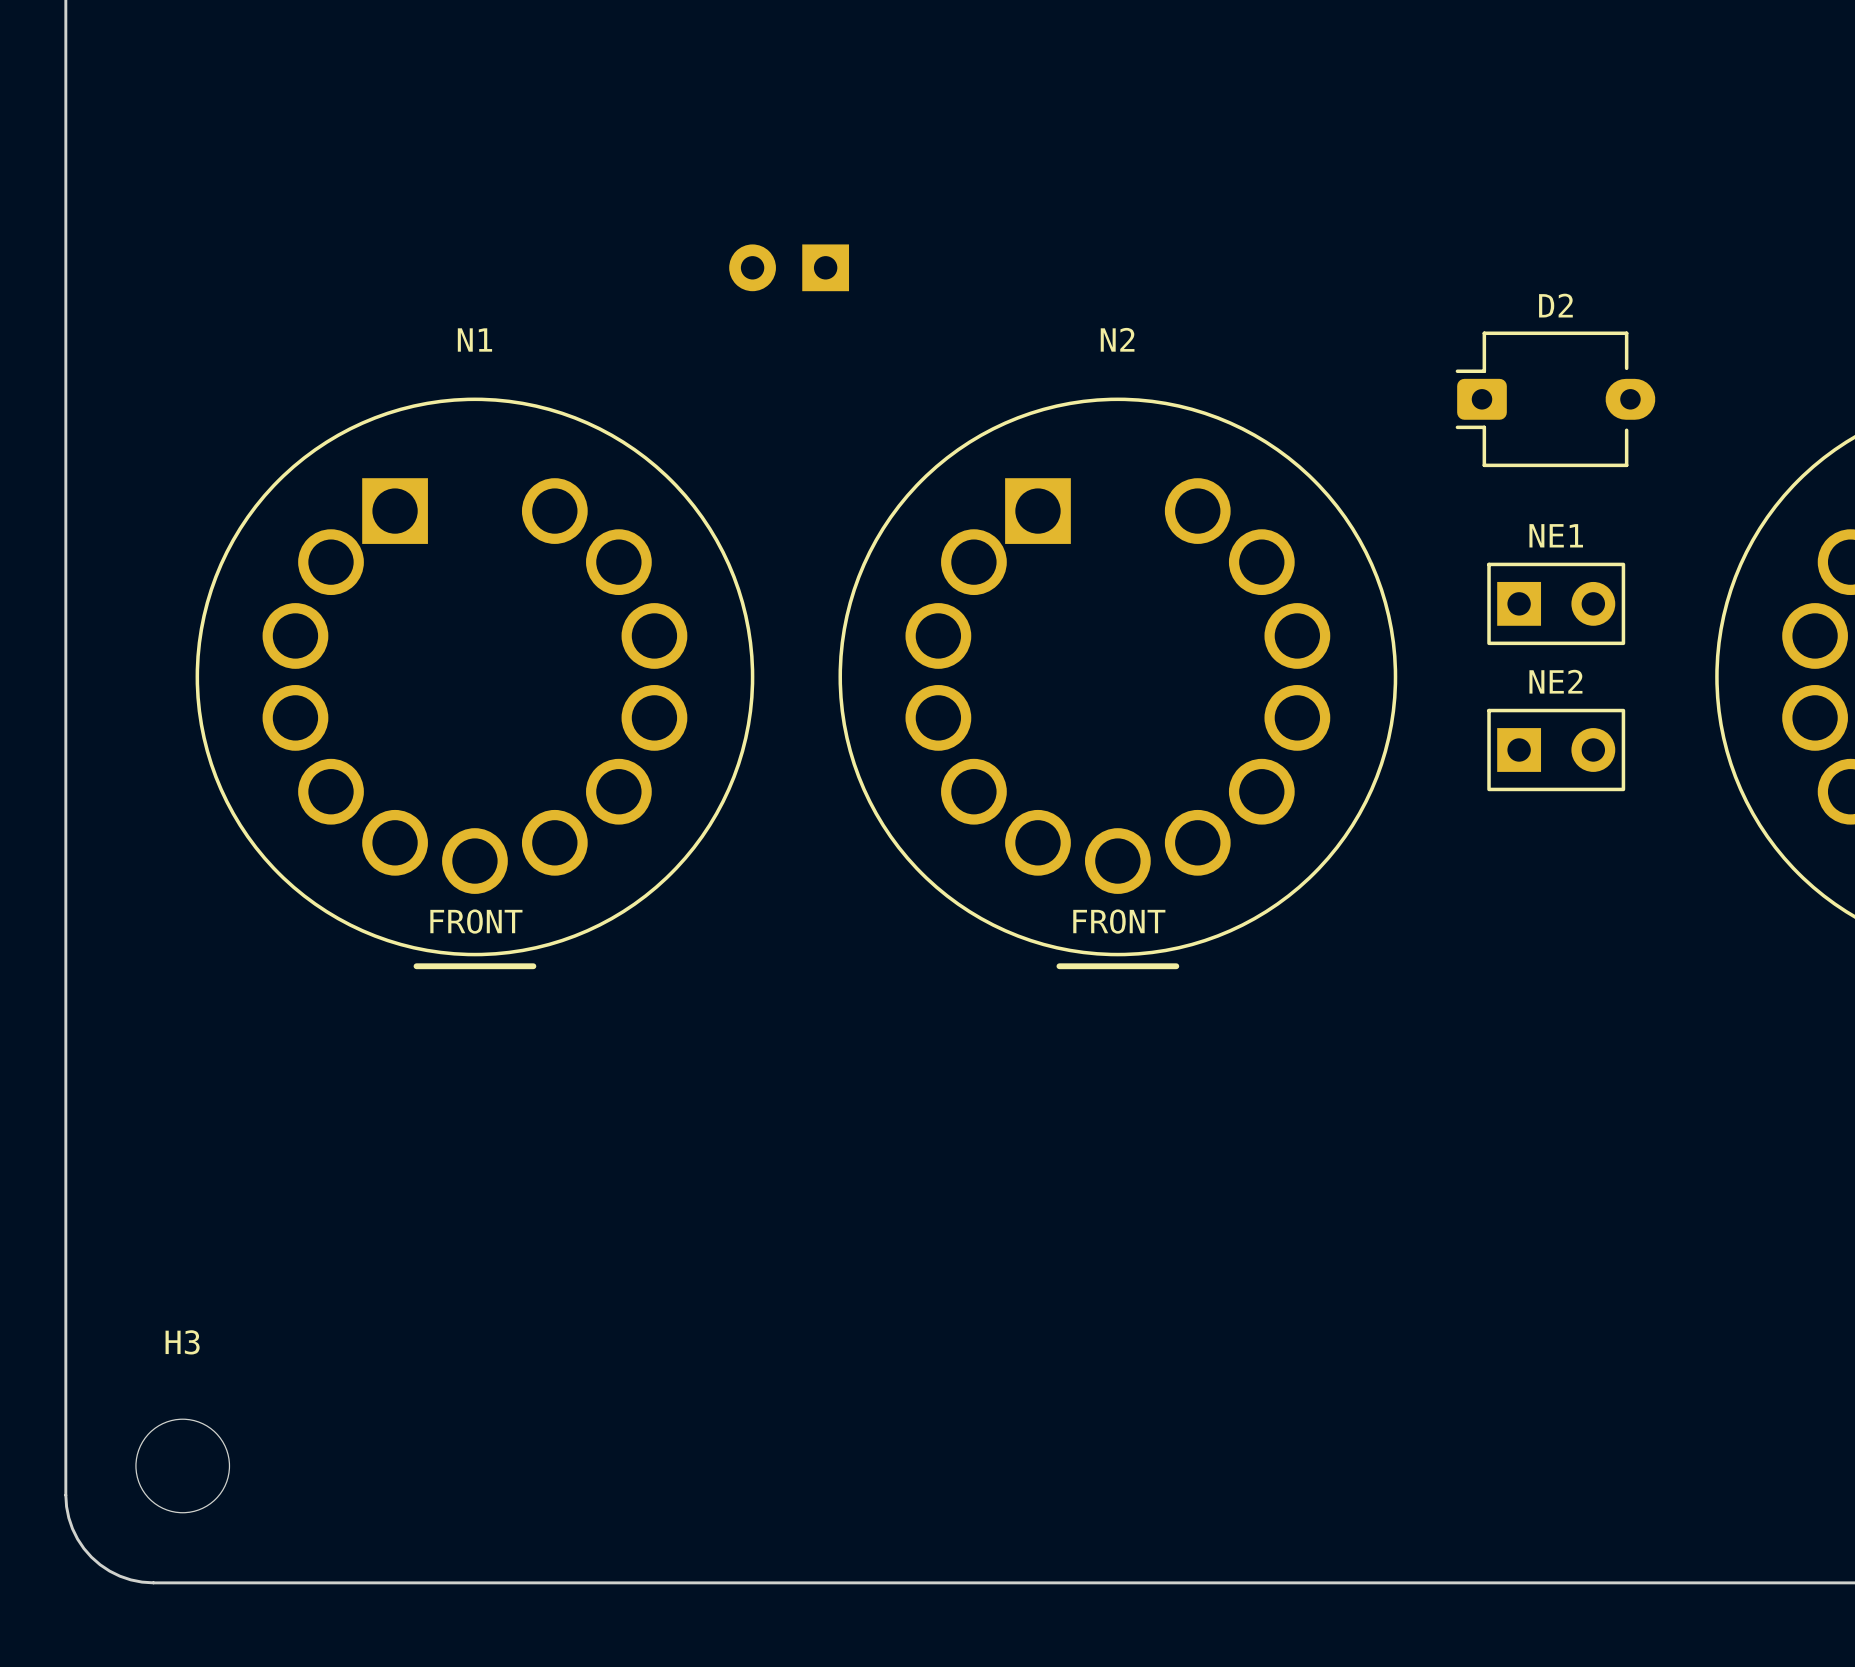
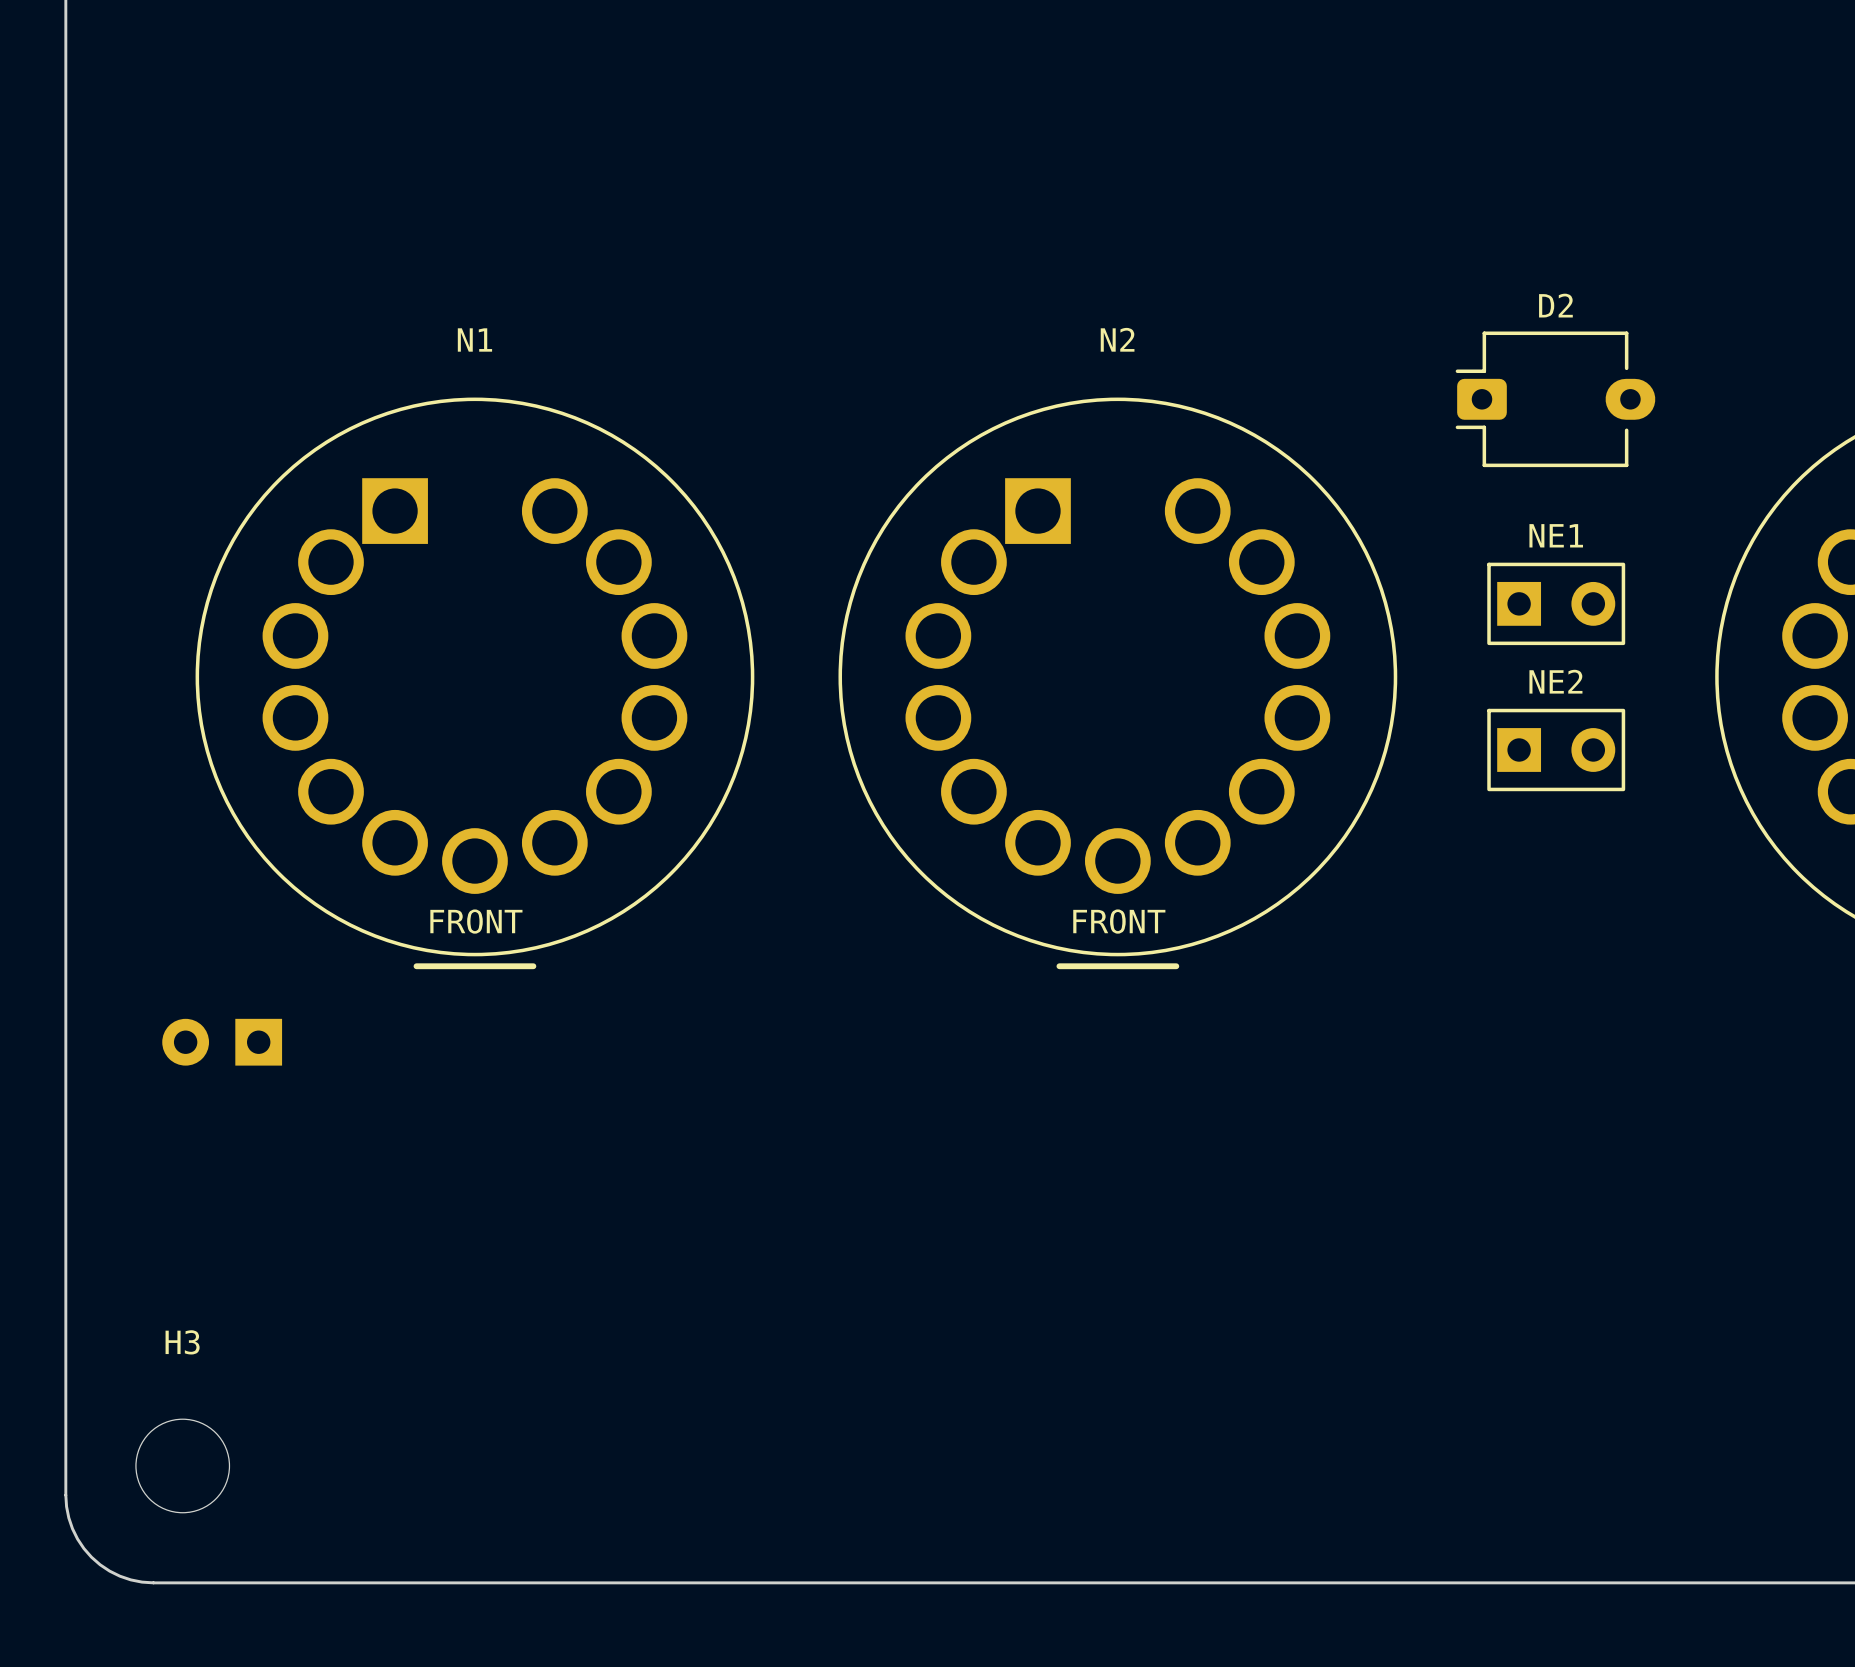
part: (789, 267) -> none
part: none -> (222, 1042)

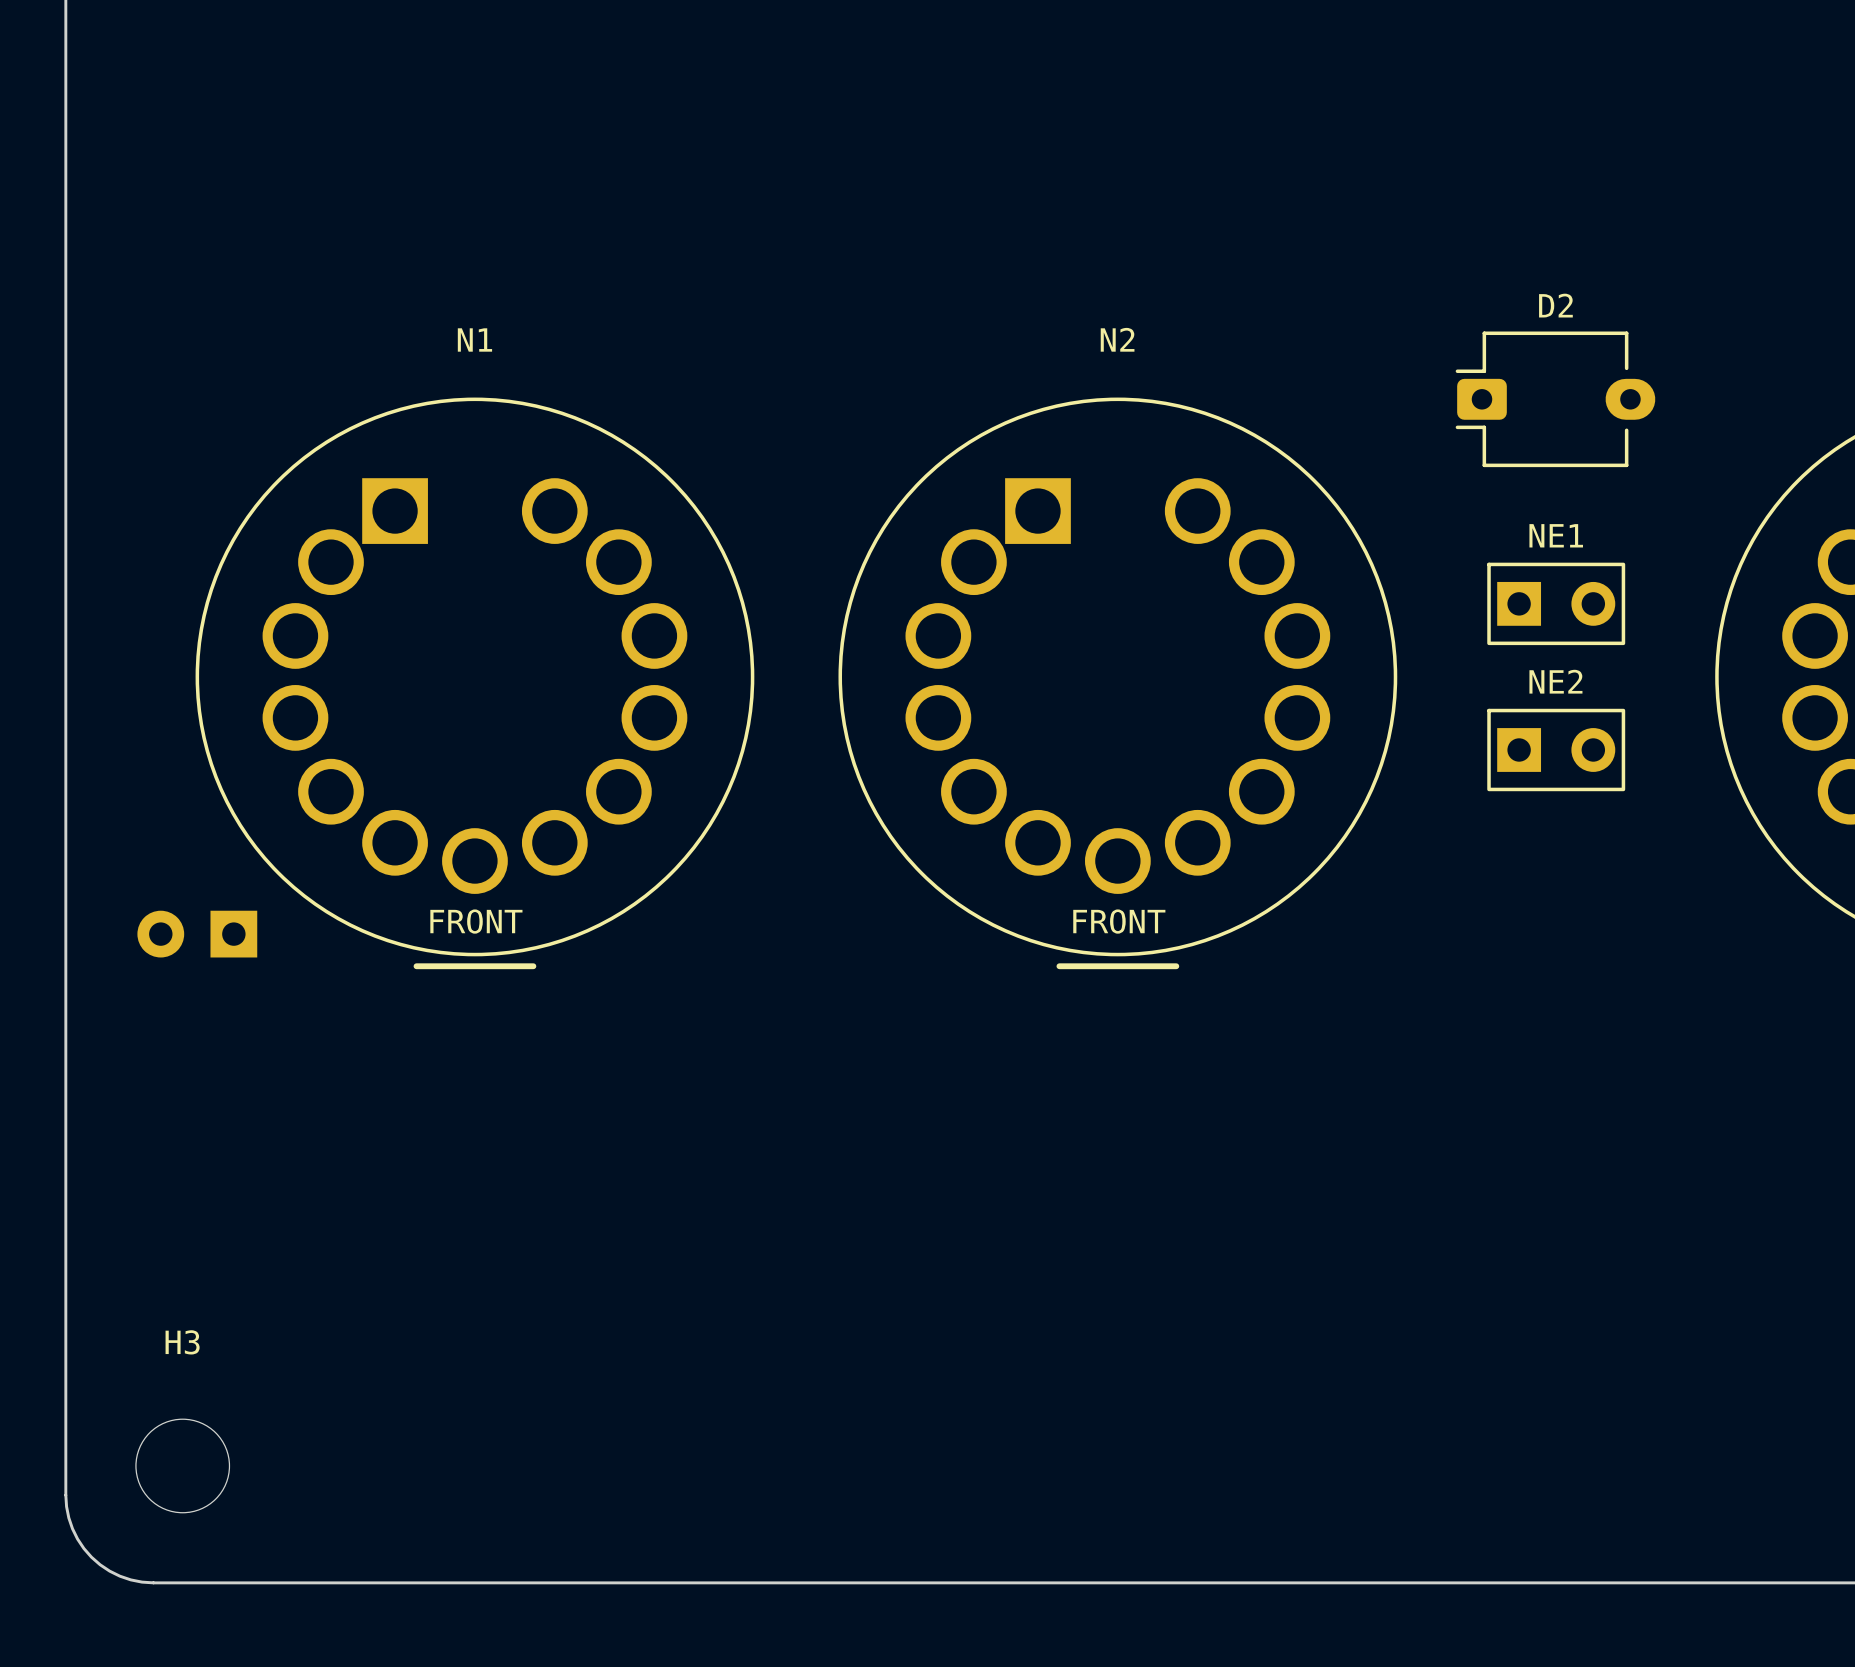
part position: (222, 1042) -> (197, 934)

